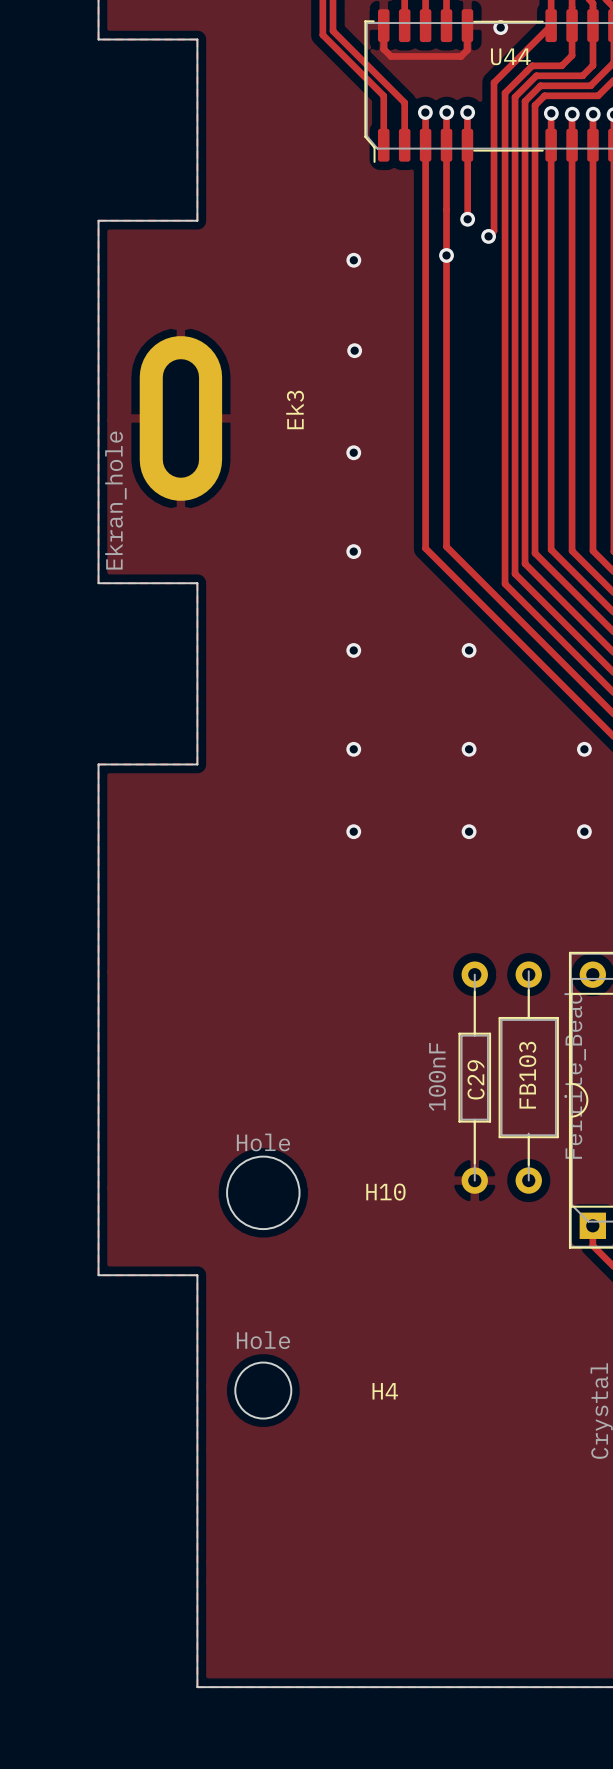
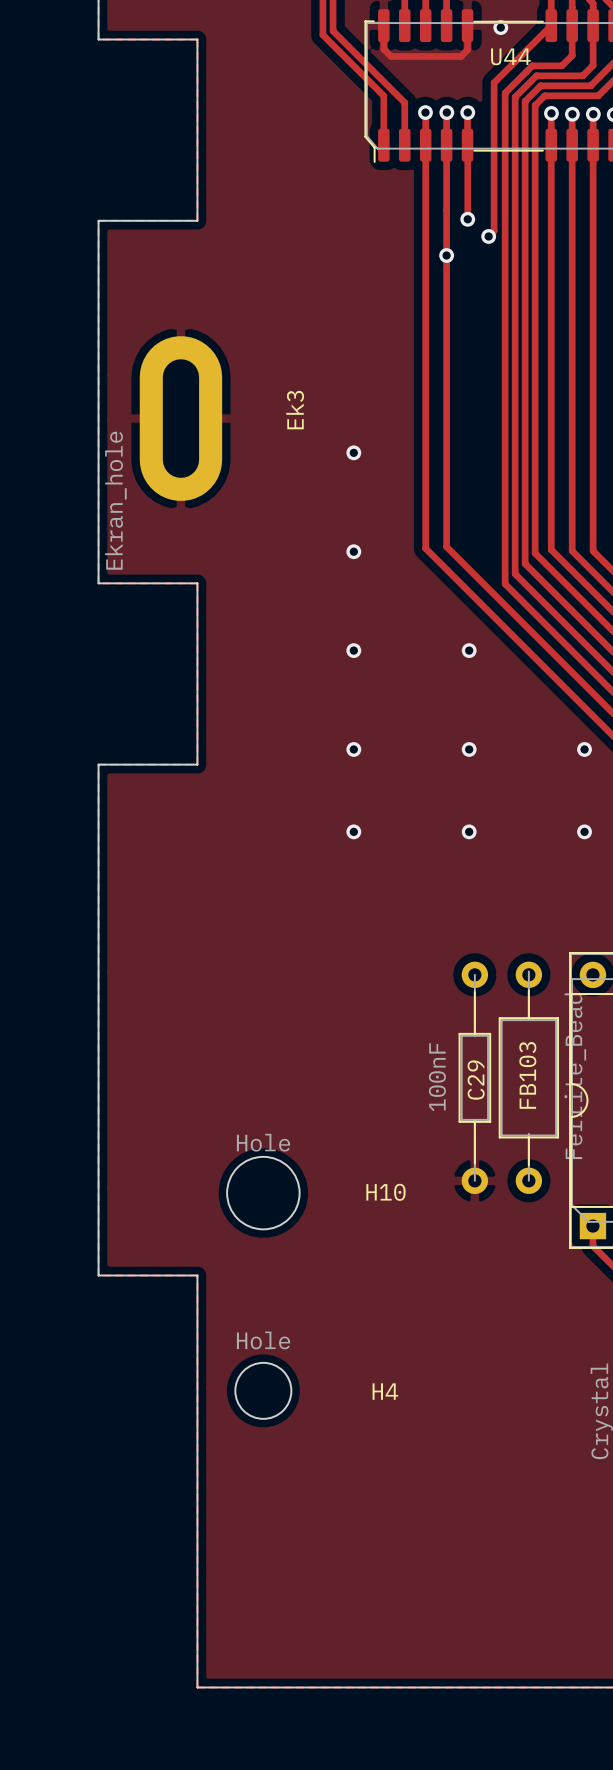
via: (353, 260) -> none
via: (354, 350) -> none

